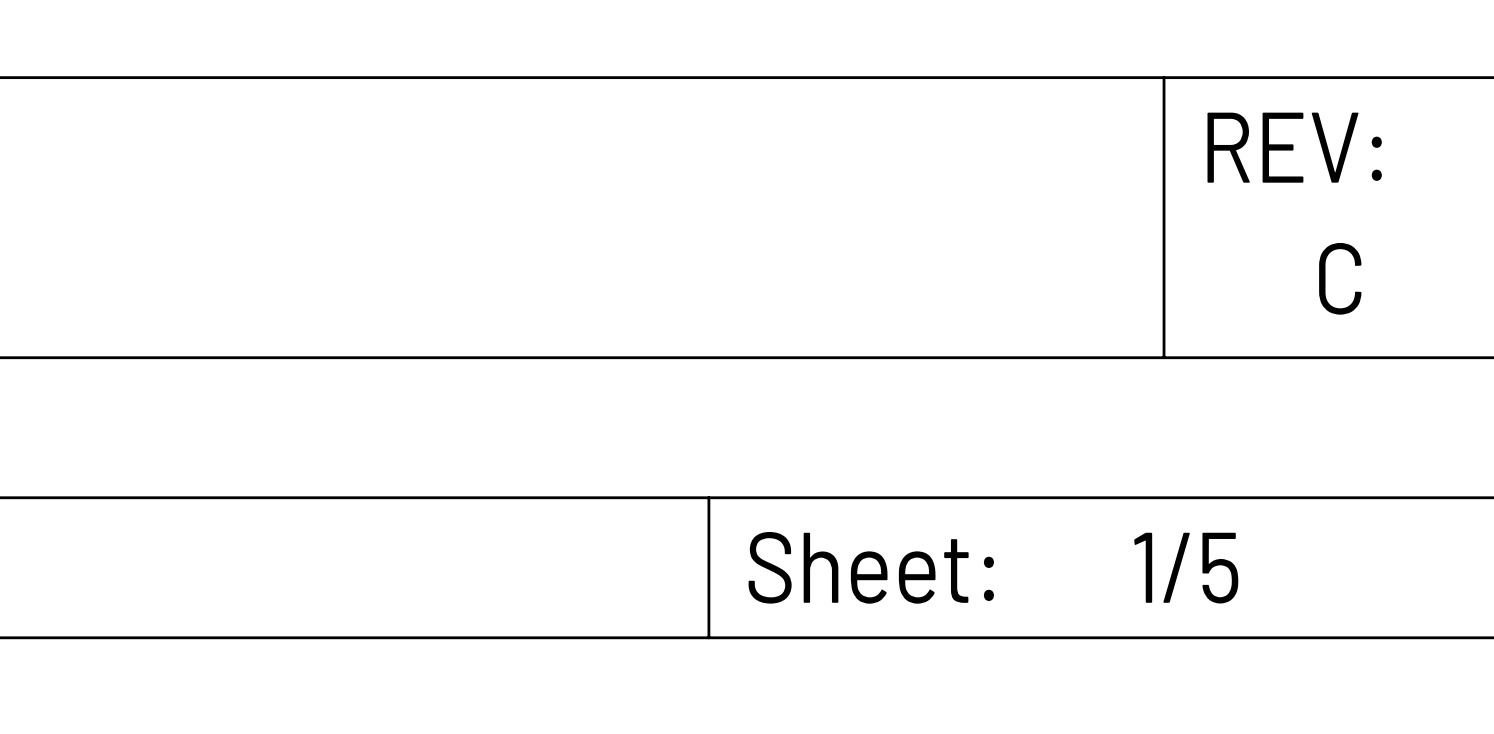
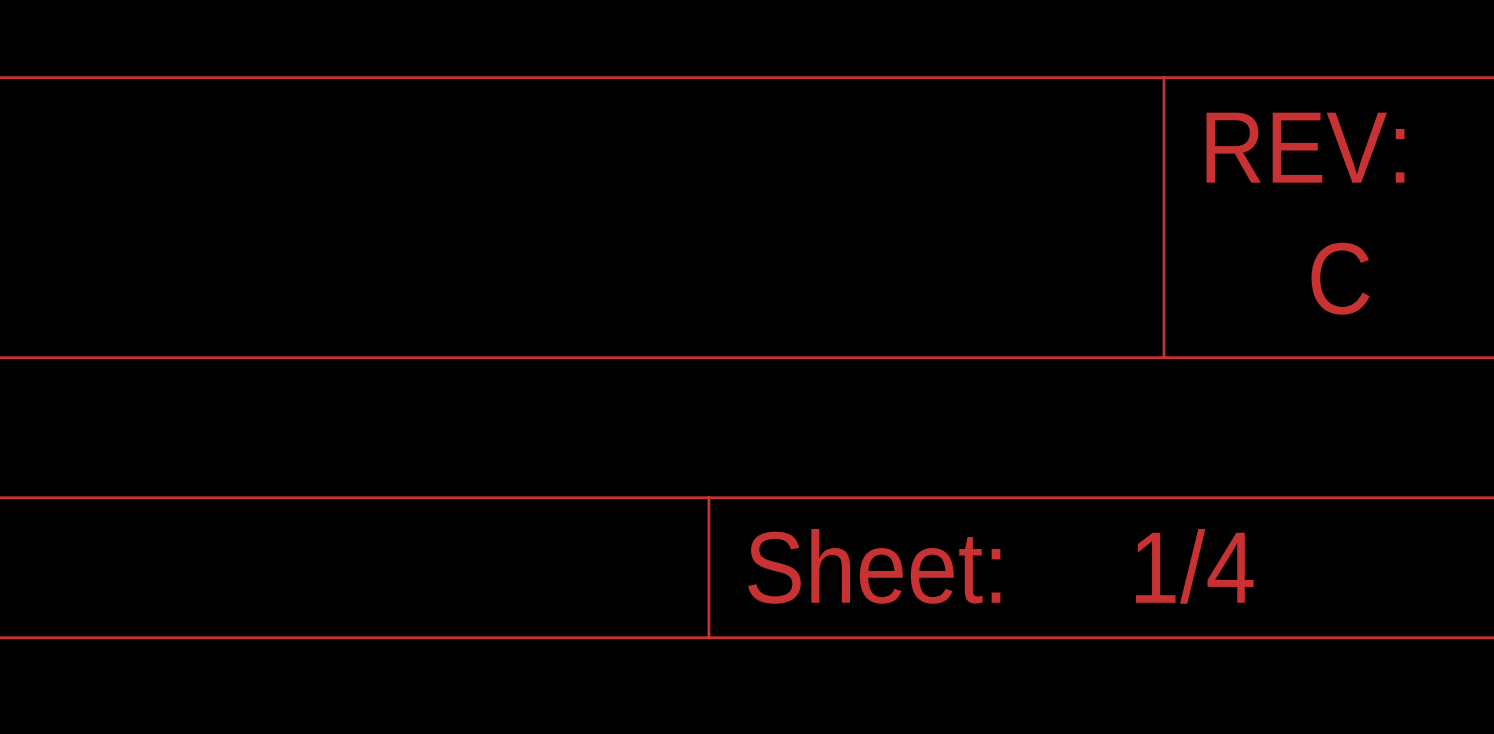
part text: 1/5 (1186, 568) -> 1/4 (1194, 566)

